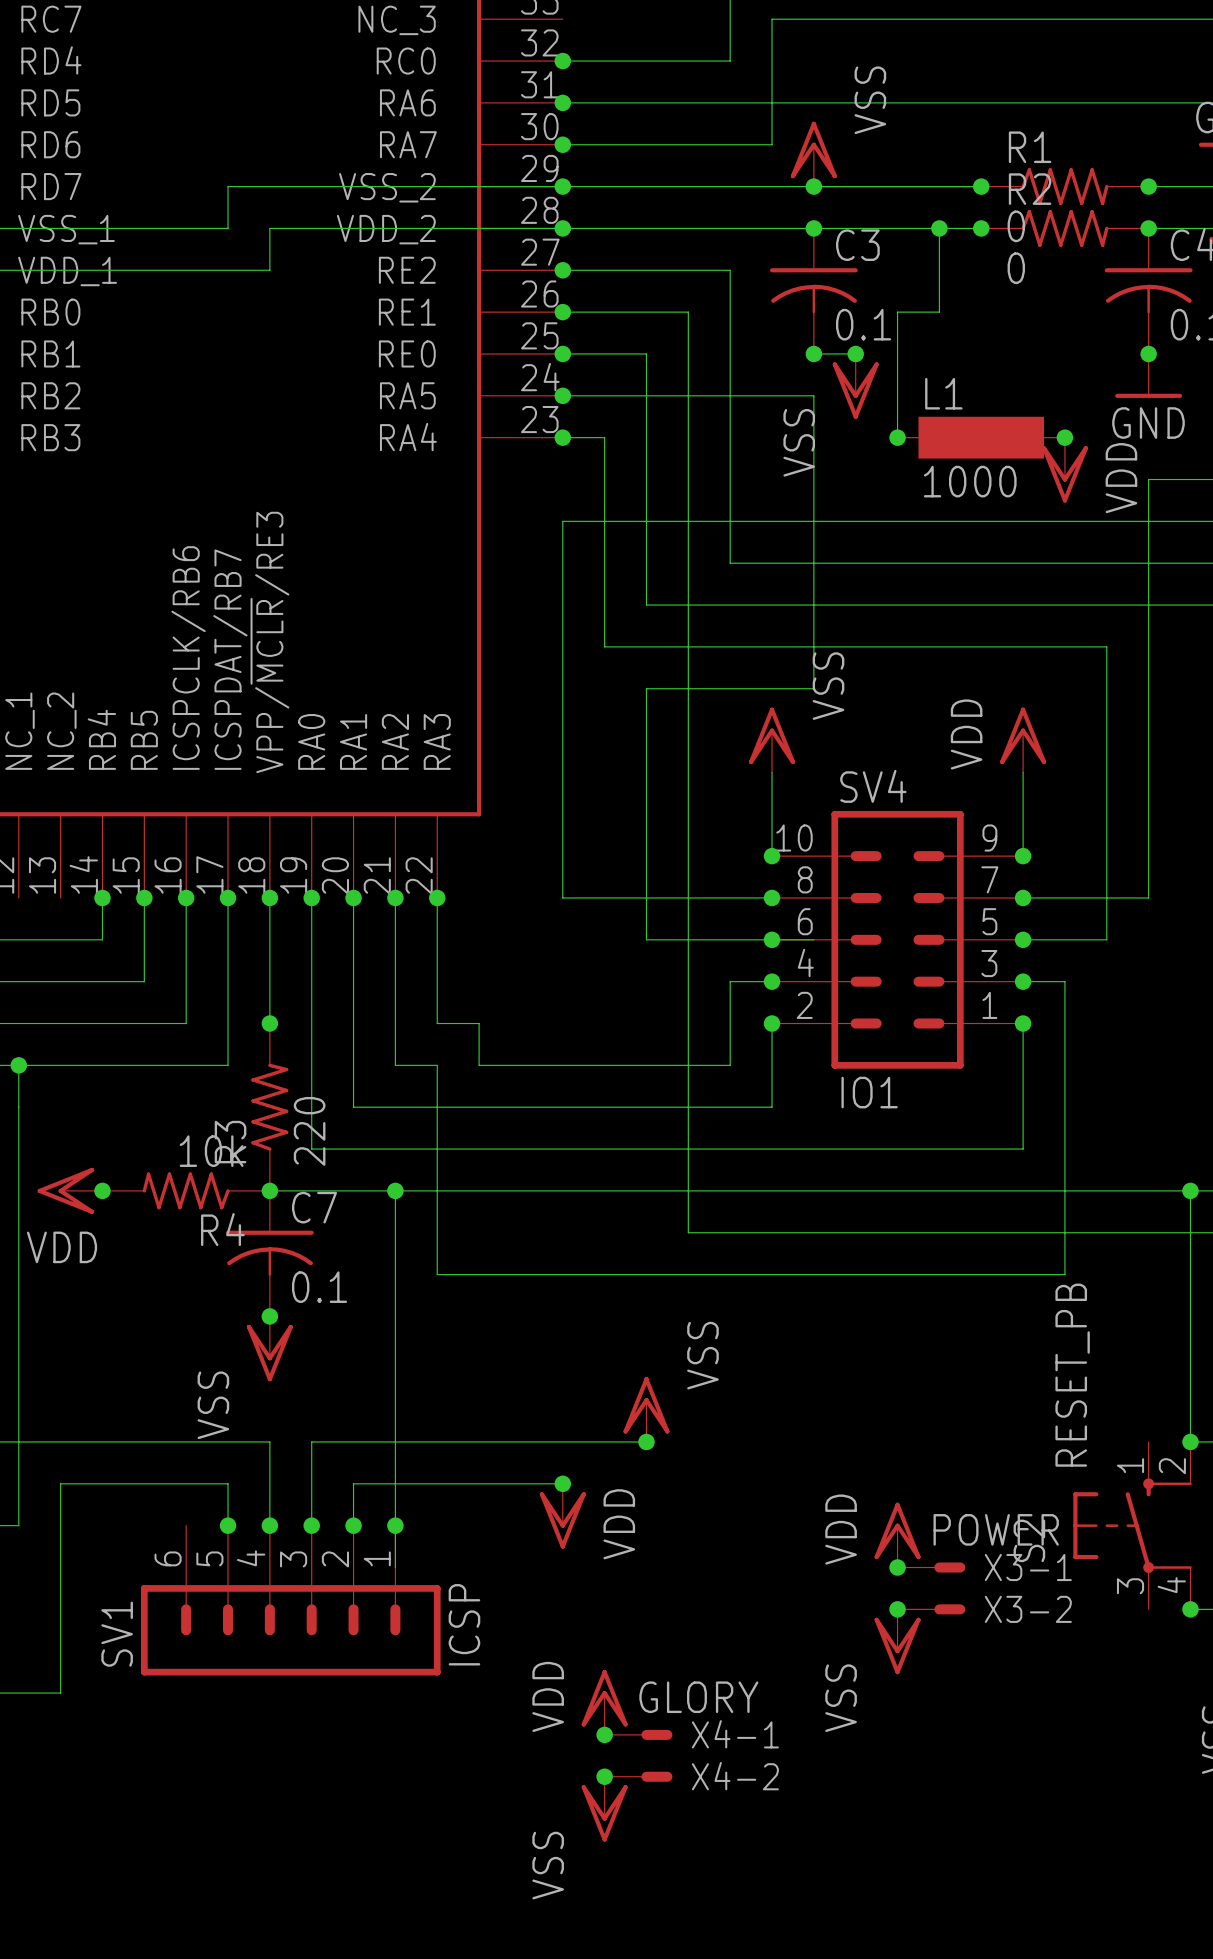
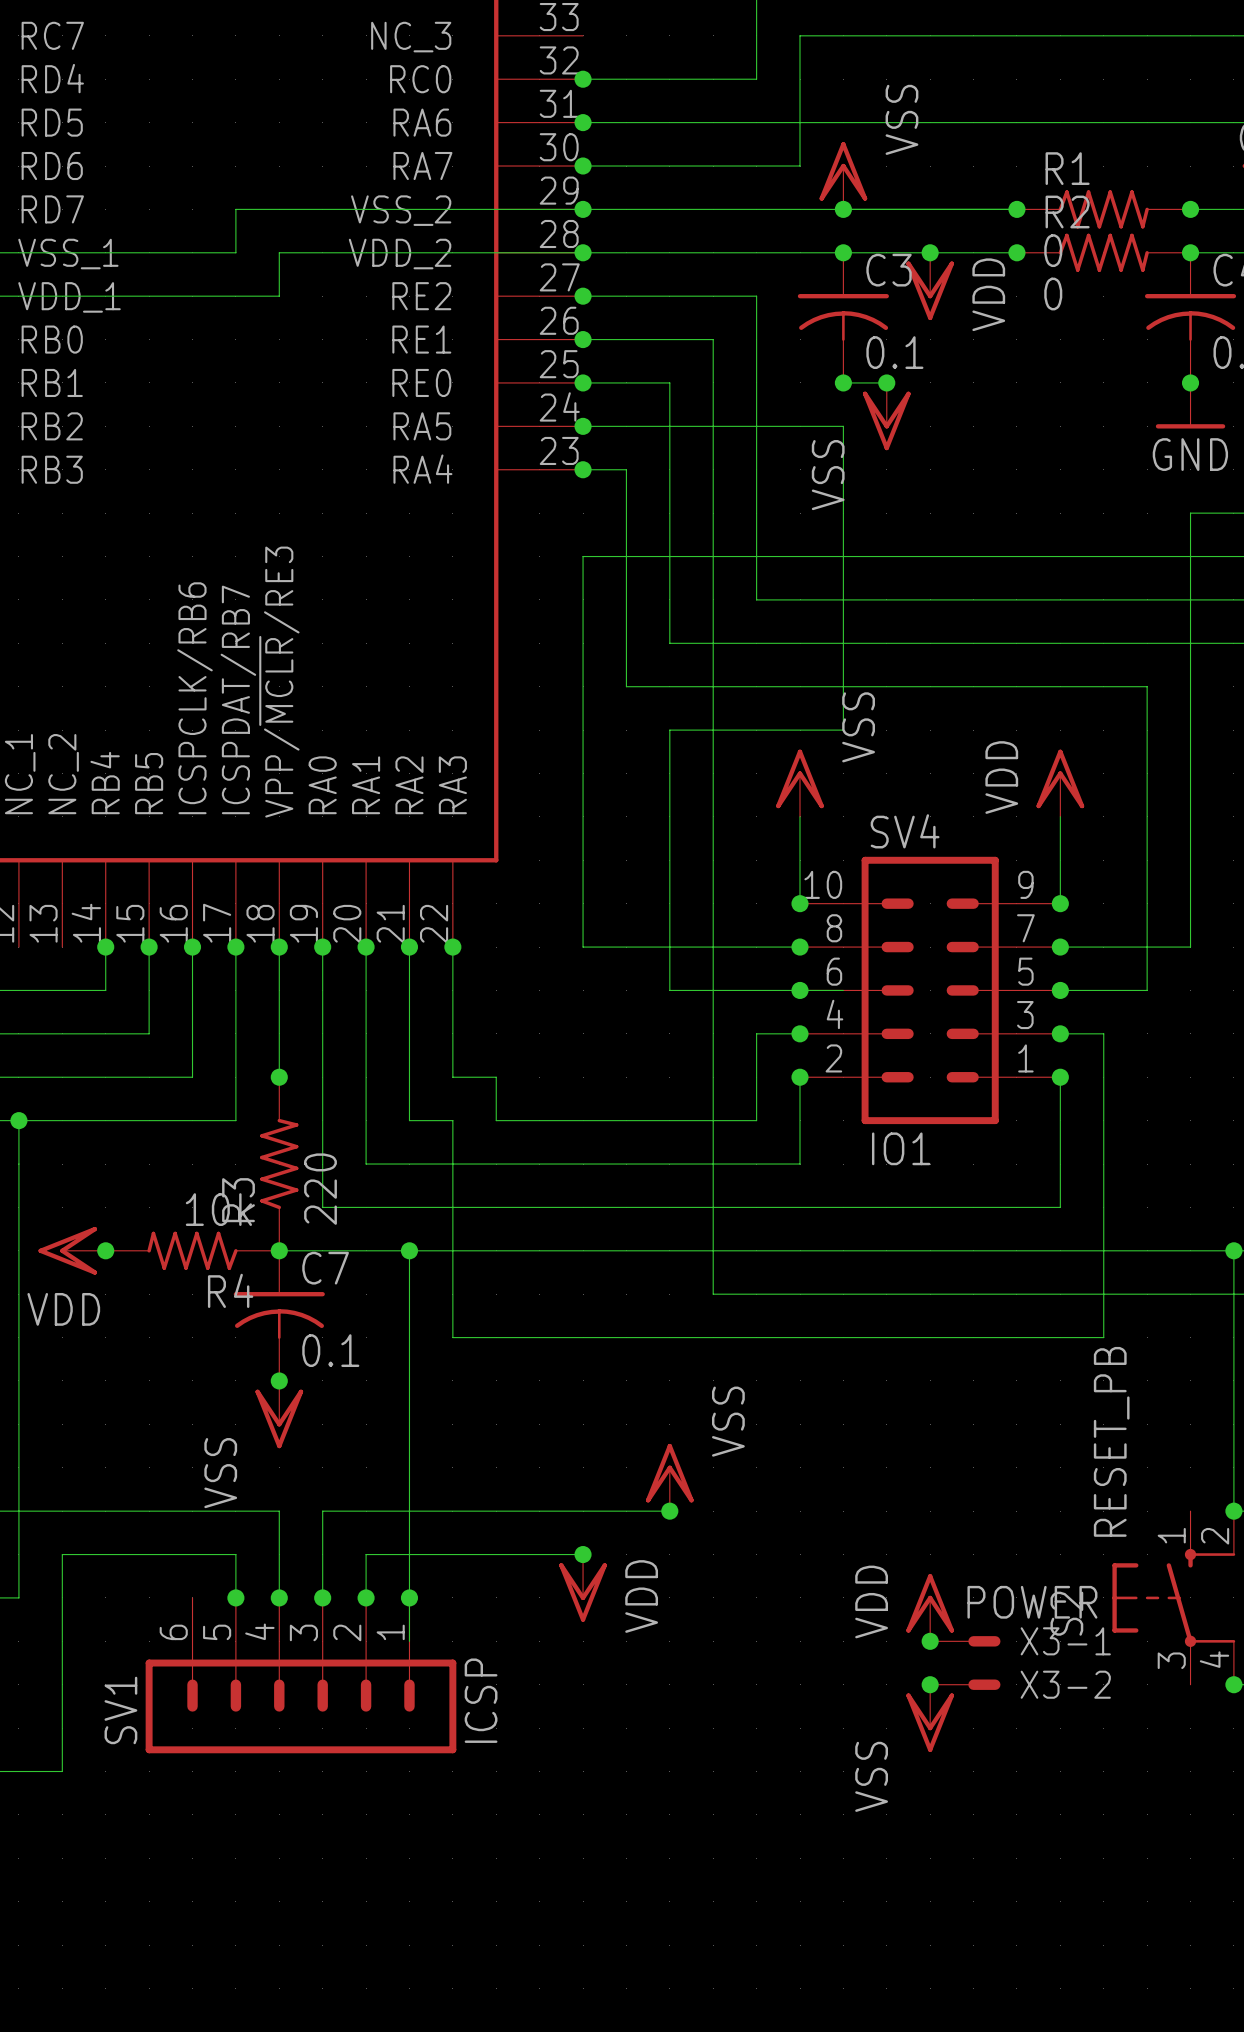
wire: (939, 228) (939, 312) (897, 312) (897, 437) -> none
junction position: (939, 228) -> (930, 252)
junction: (897, 437) -> none
L1: 1000 (981, 437) -> none
junction: (1064, 437) -> none
power symbol position: VDD (1064, 470) -> VDD (930, 286)
power symbol: VDD (604, 1702) -> none
junction: (604, 1734) -> none
X4-1: GLORY (638, 1734) -> none
junction: (604, 1776) -> none
X4-2: (638, 1776) -> none
power symbol: VSS (604, 1809) -> none

